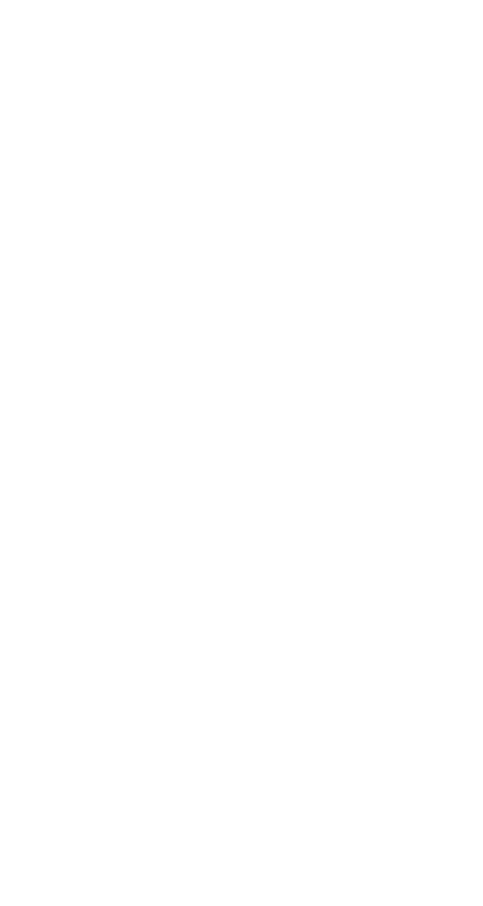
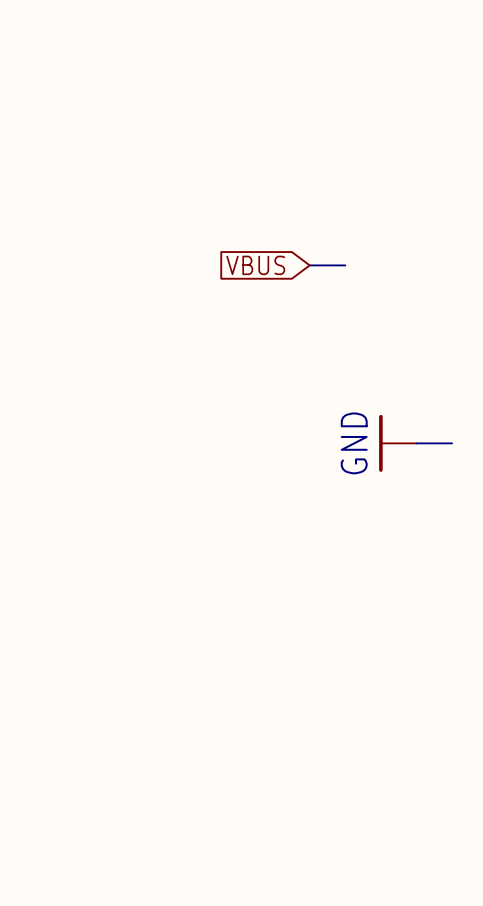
global label: none -> VBUS (255, 265)
wire: none -> (309, 265) (345, 265)
power symbol: none -> GND (397, 443)
wire: none -> (416, 443) (452, 443)

